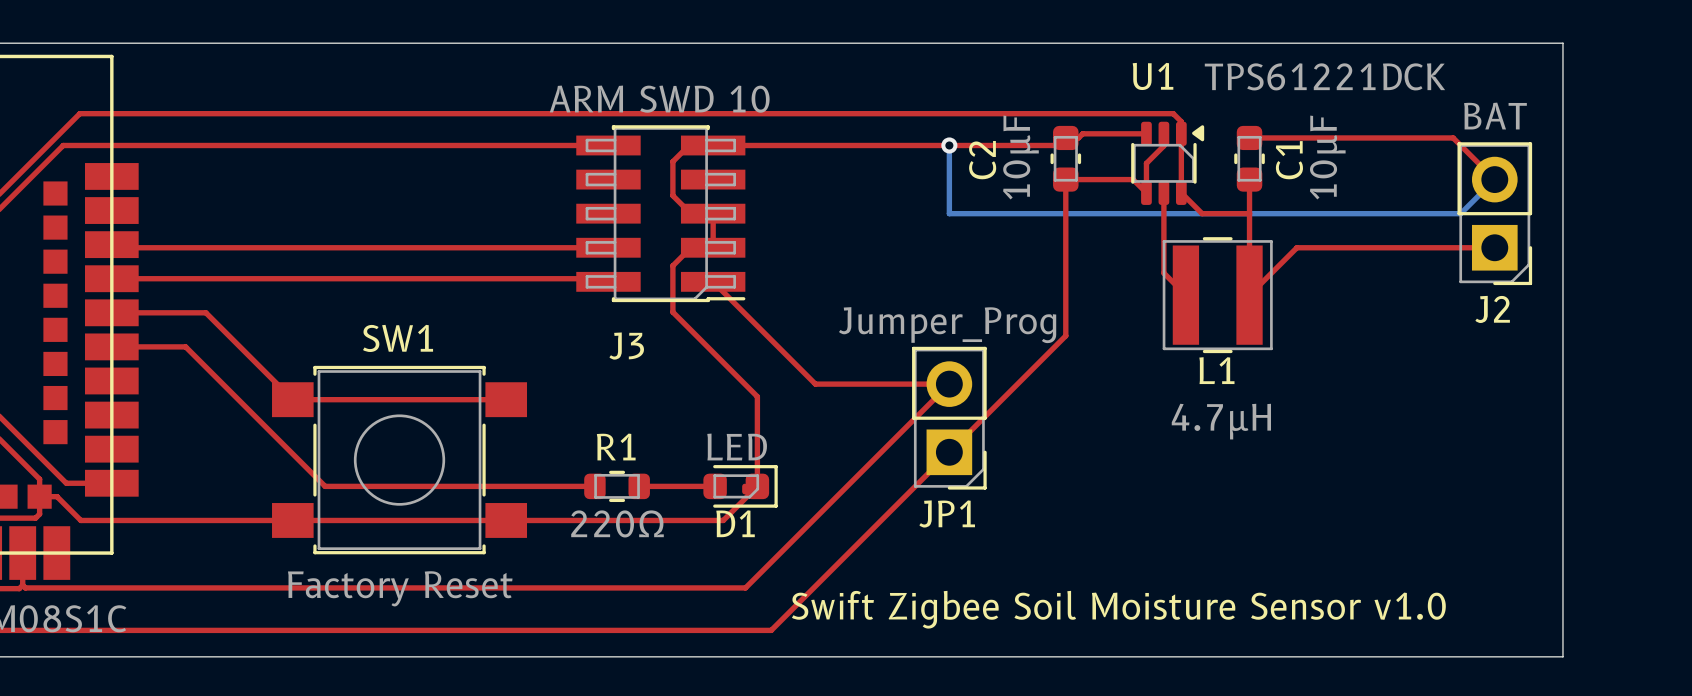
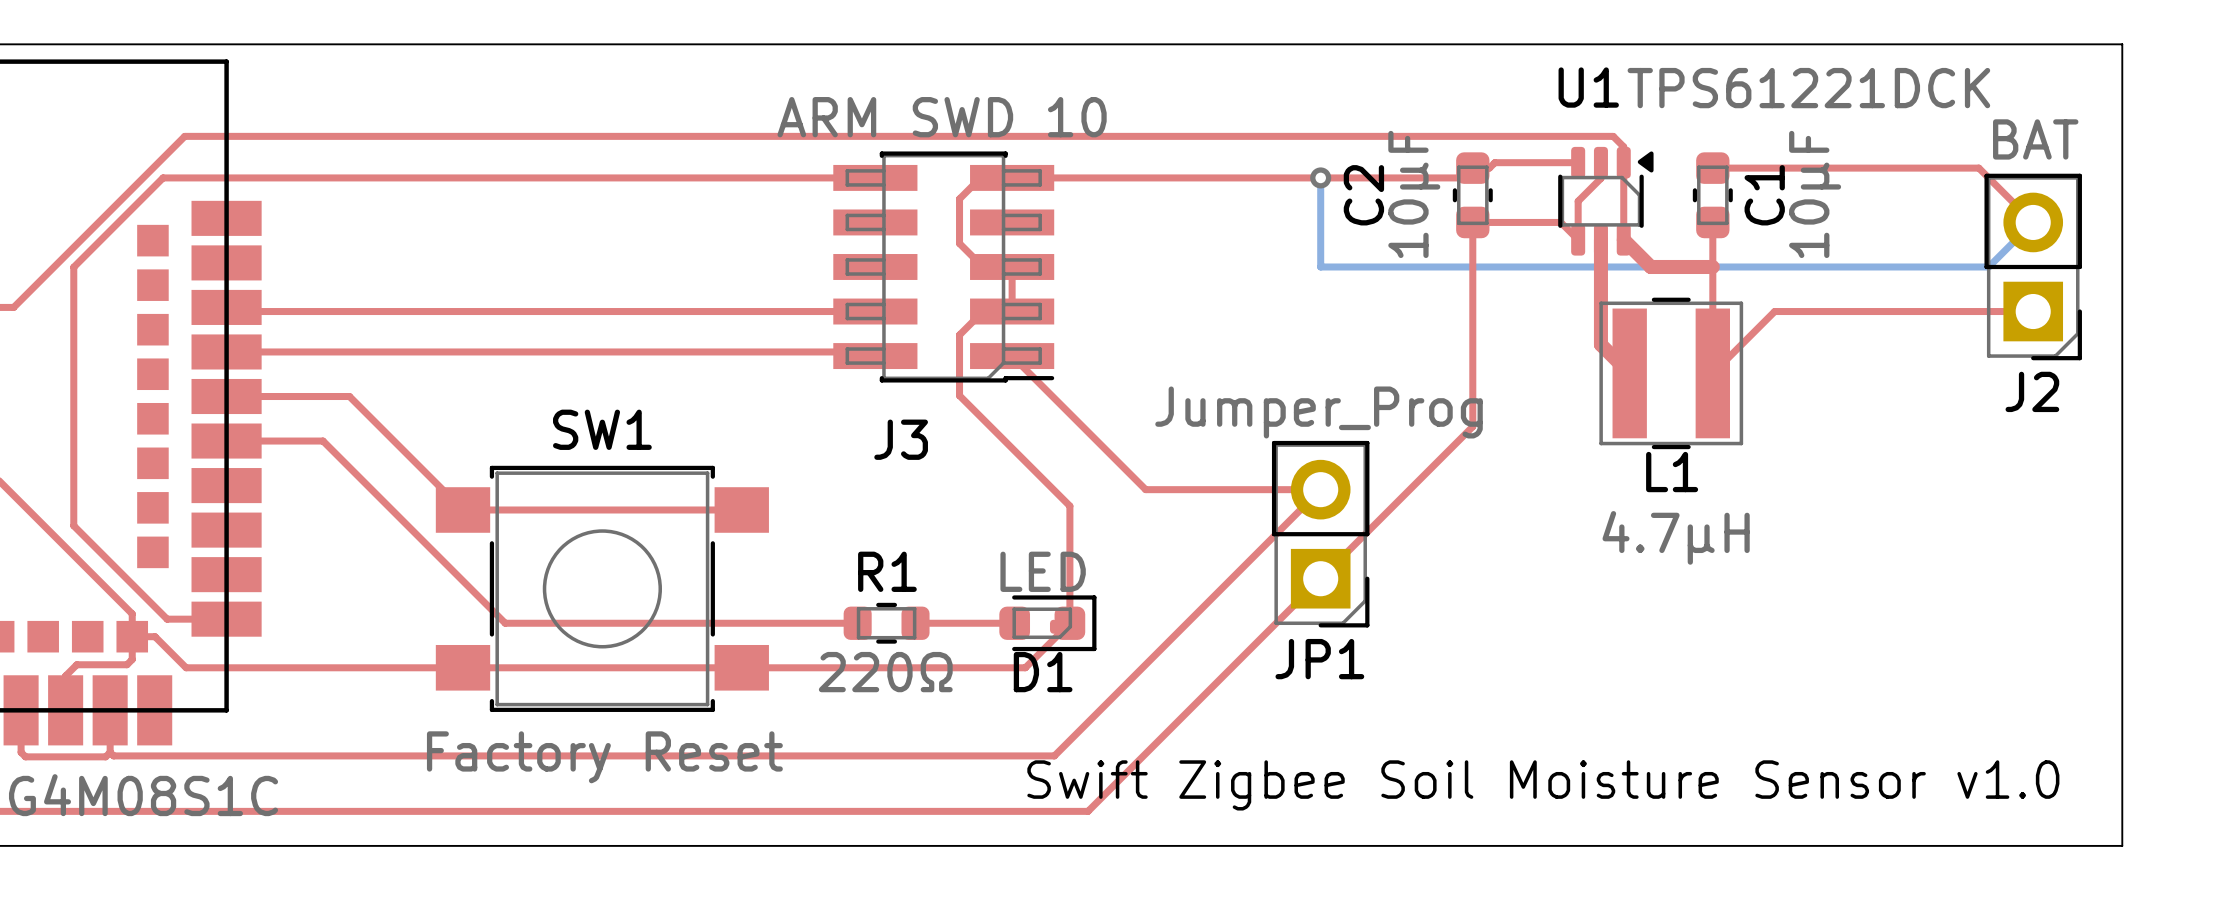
top track width: thin (1163, 192) (1163, 273) (1185, 295) -> thick (1600, 239) (1600, 344) (1629, 373)
top track width: thin (1181, 192) (1202, 213) (1249, 213) -> thick (1623, 239) (1650, 266) (1712, 266)

